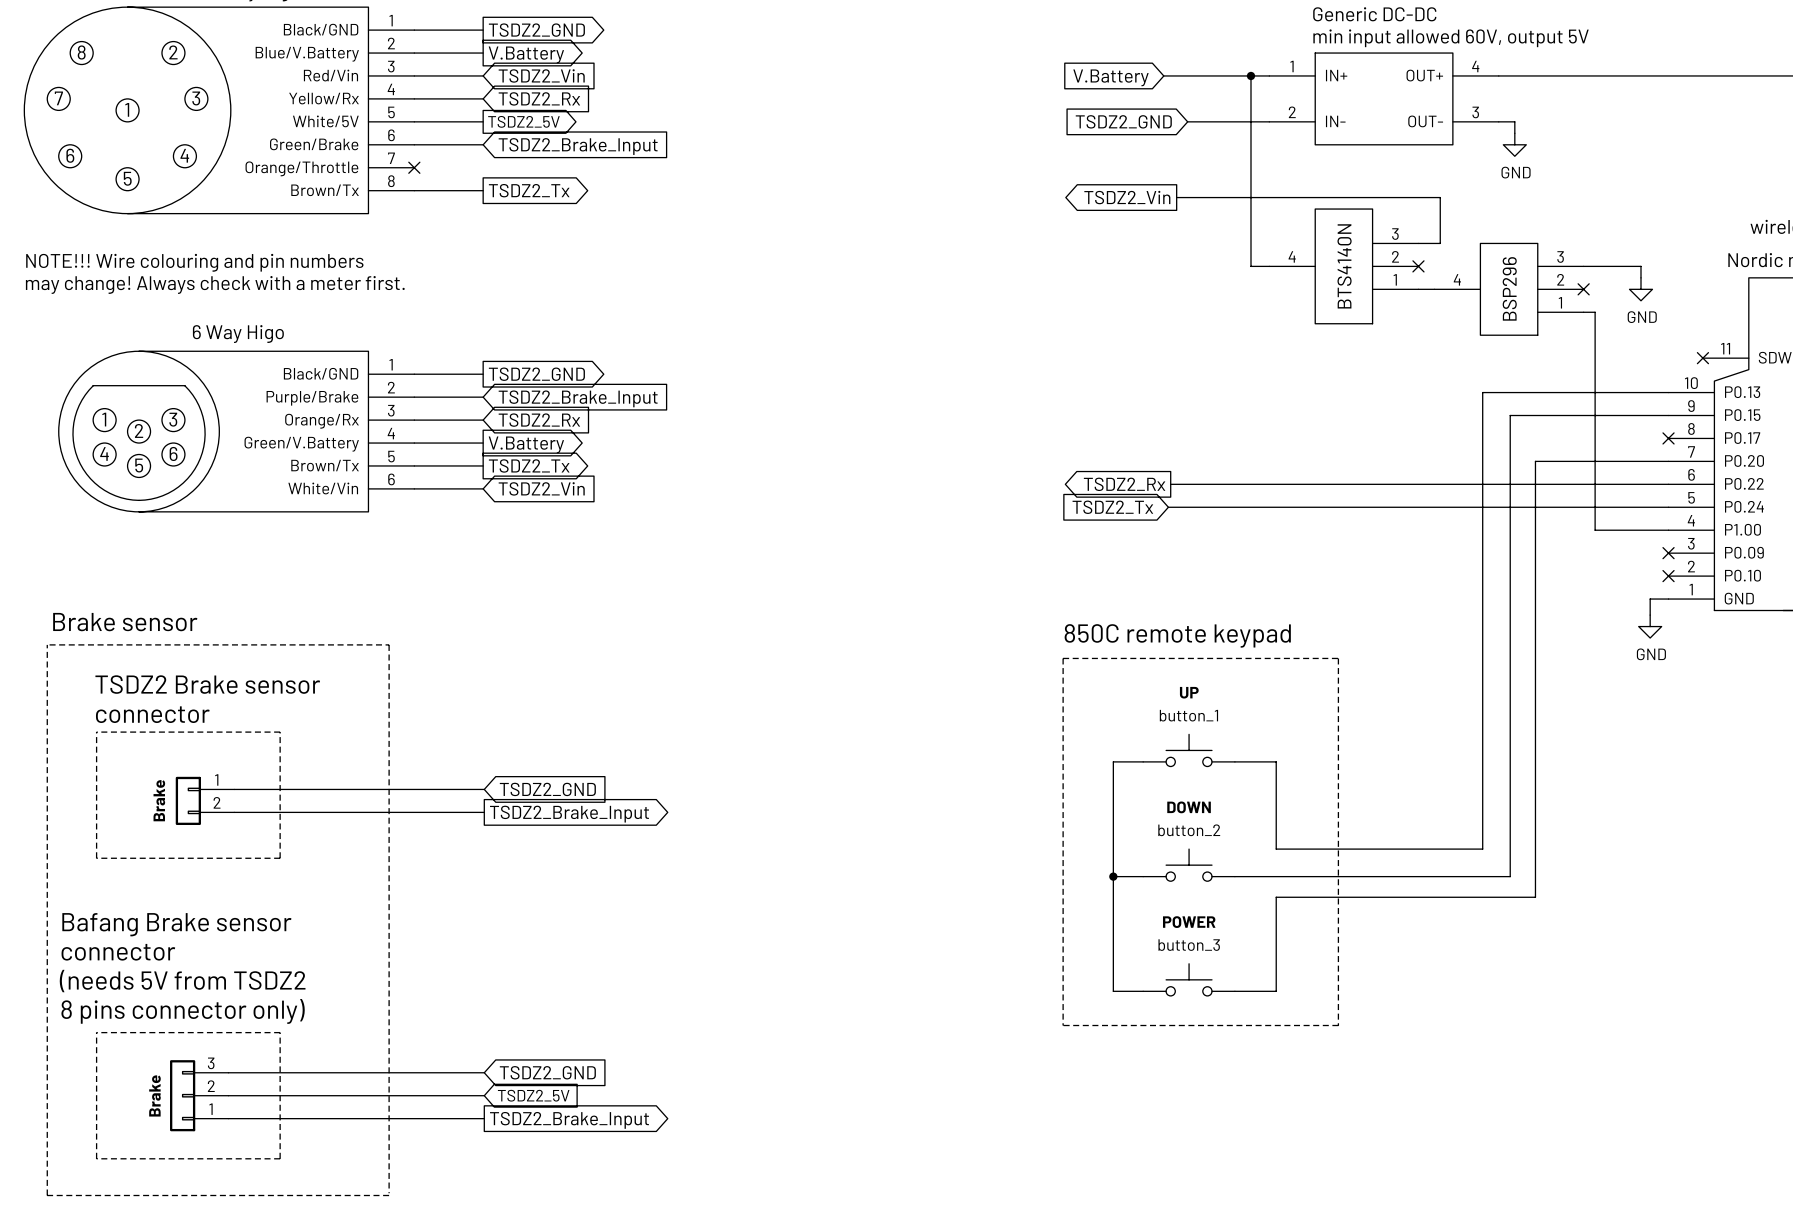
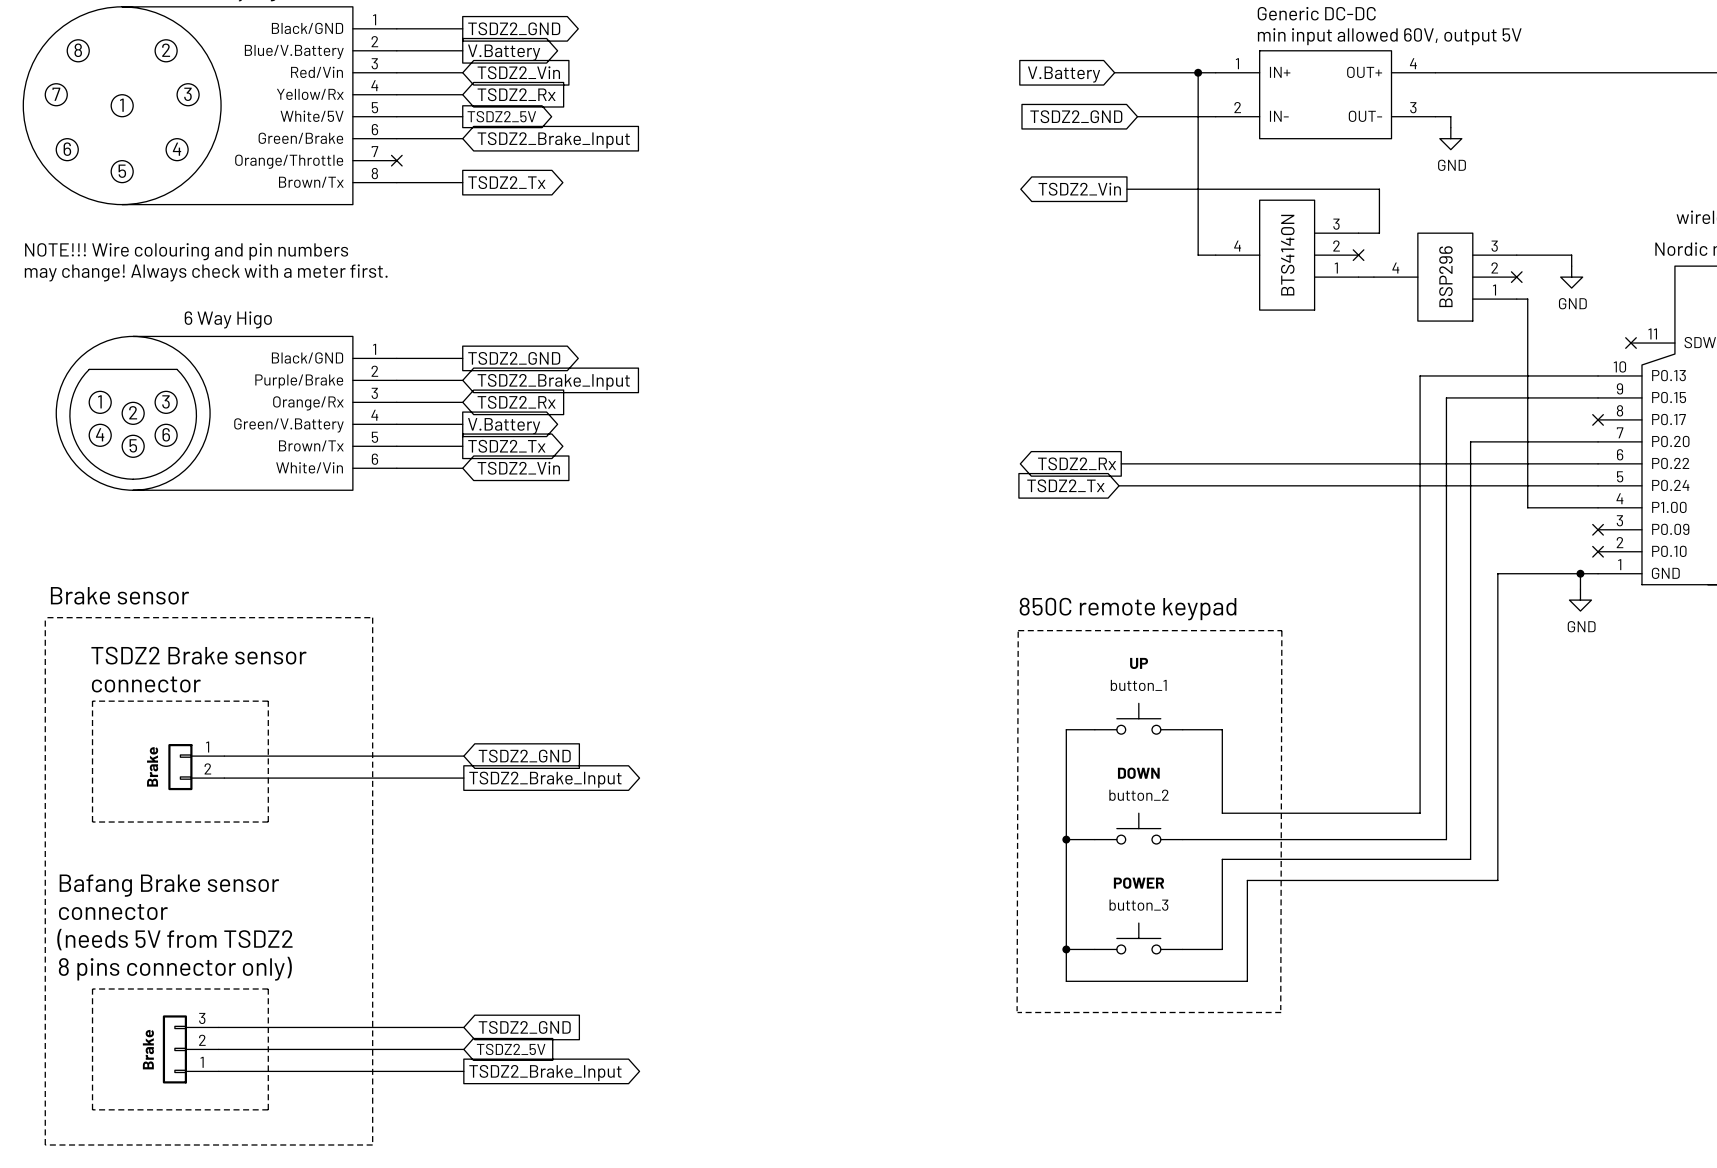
wire: none -> (1580, 573) (1497, 573) (1497, 880) (1247, 880) (1247, 981) (1066, 981) (1066, 949)
junction: none -> (1580, 573)
line: (1063, 658) (1063, 1025) (1338, 1025) (1338, 658) -> (1280, 1010) (1281, 630)
line: none -> (1018, 631) (1017, 1011)
junction: none -> (1066, 949)
line: none -> (1017, 1012) (1281, 1012)

